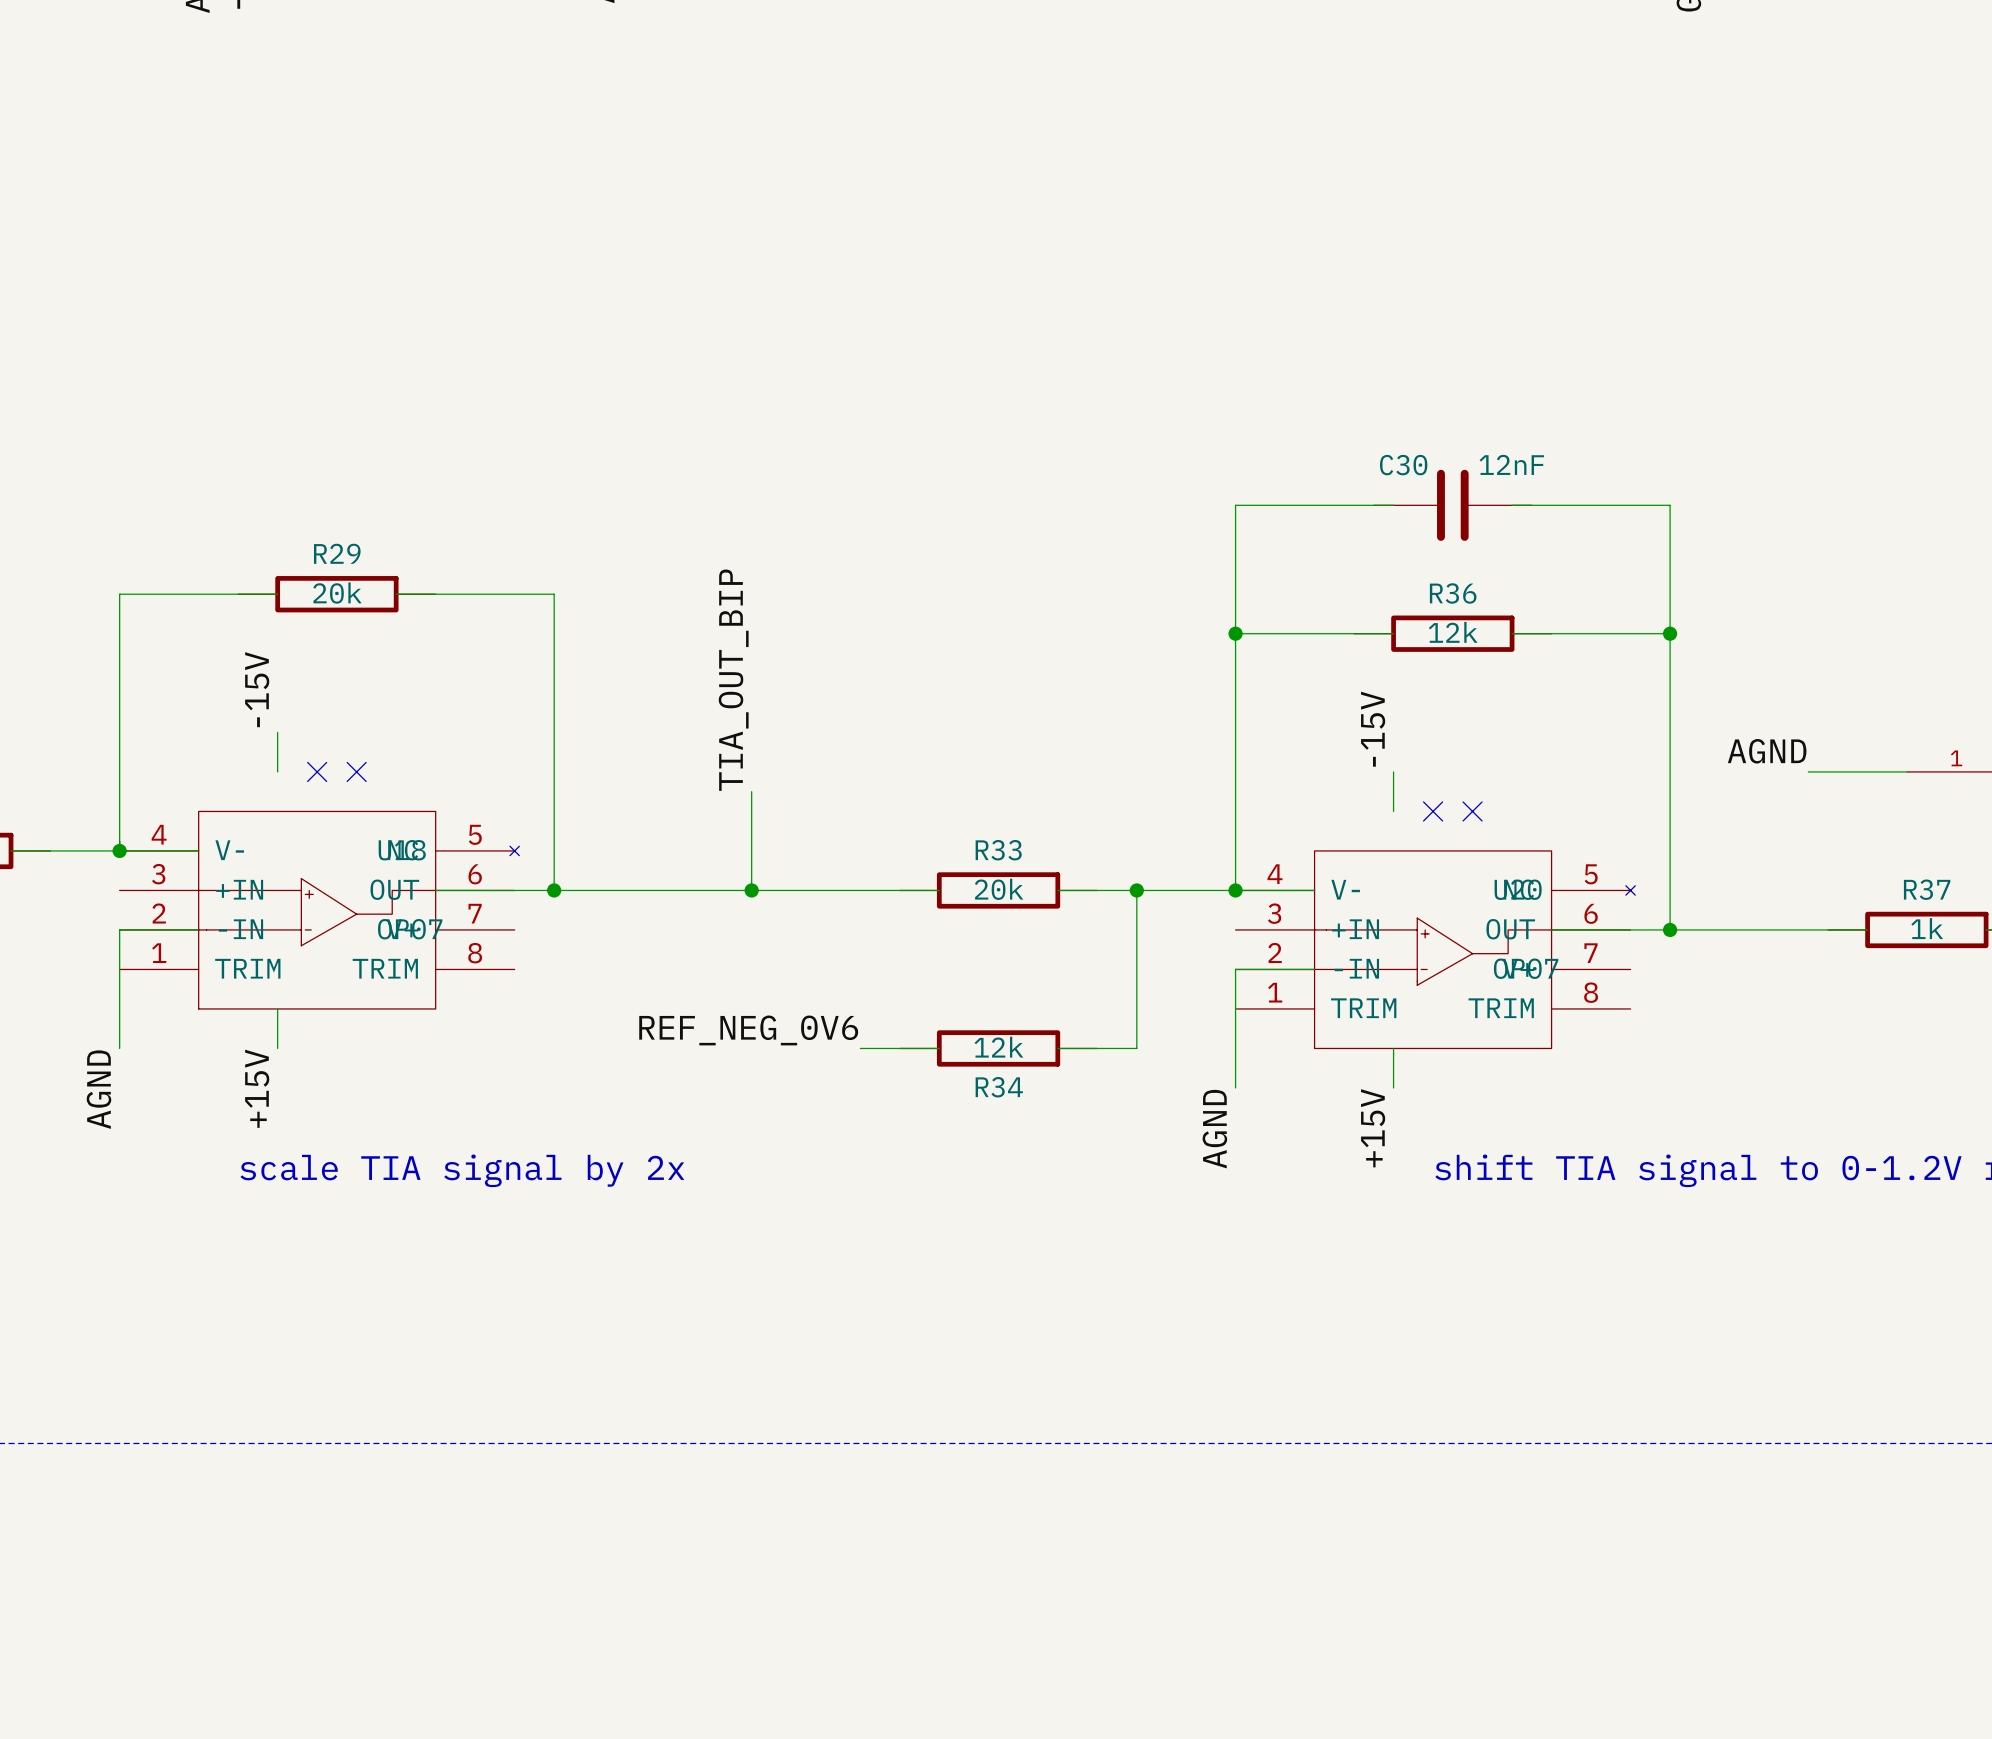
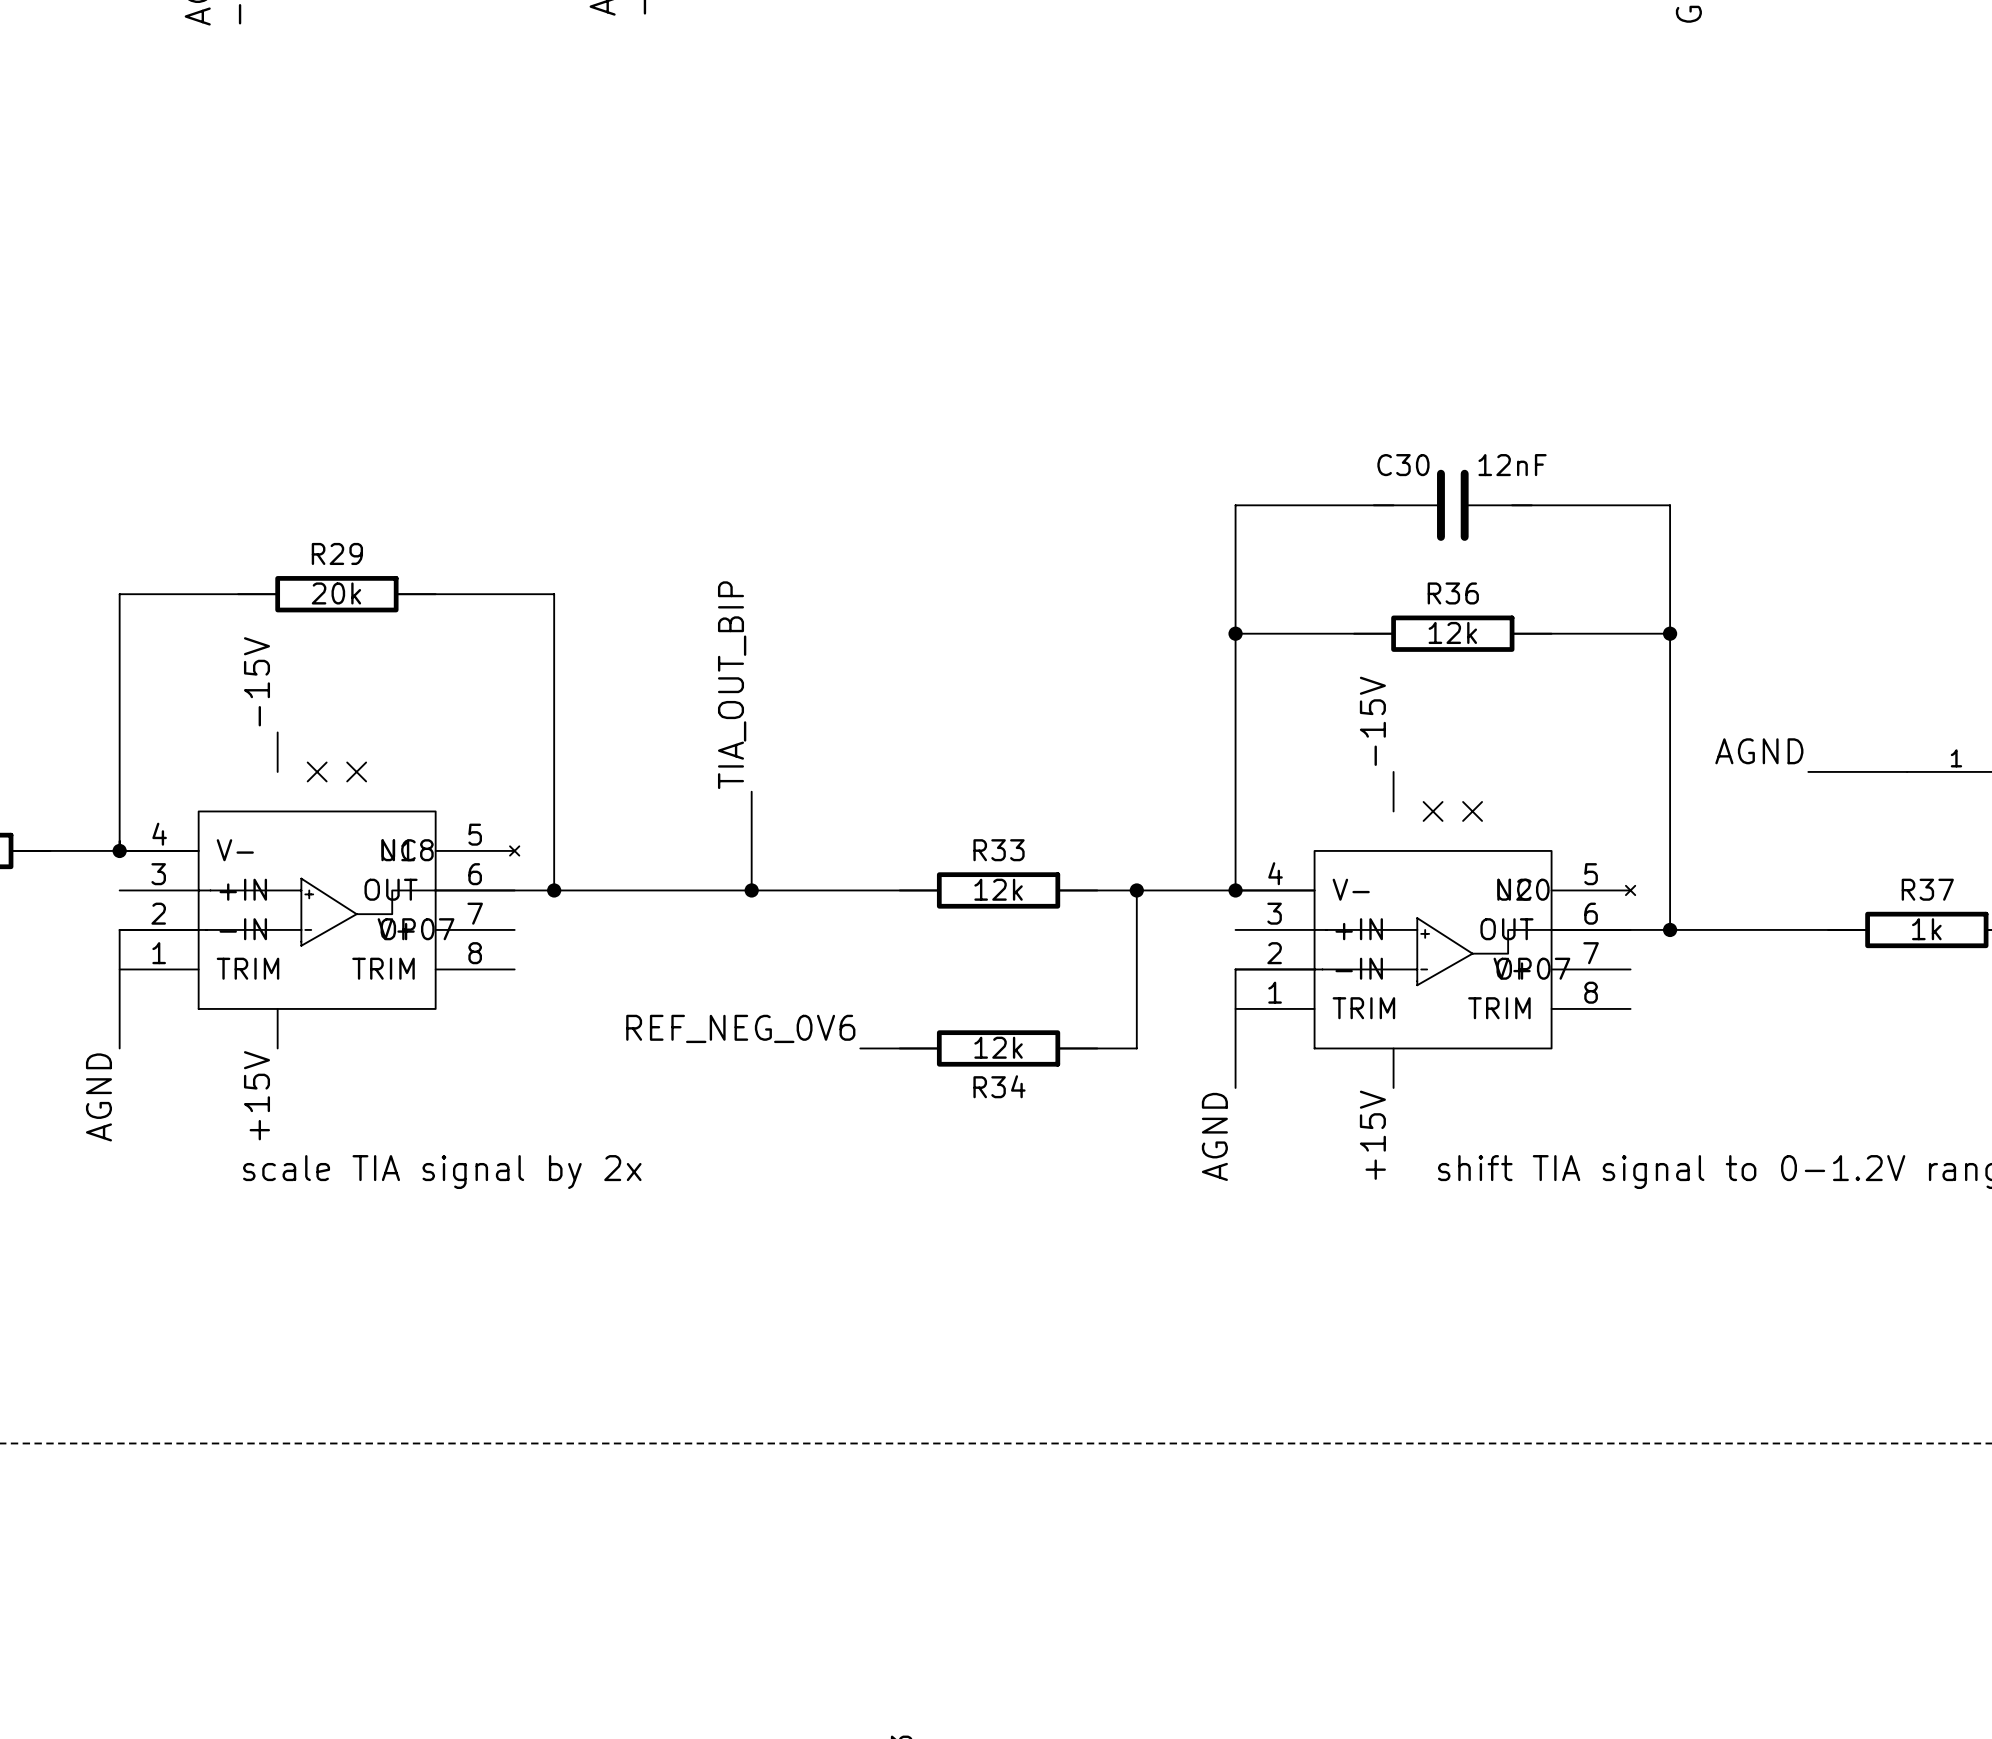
R33 value: 20k (999, 889) -> 12k (998, 889)

